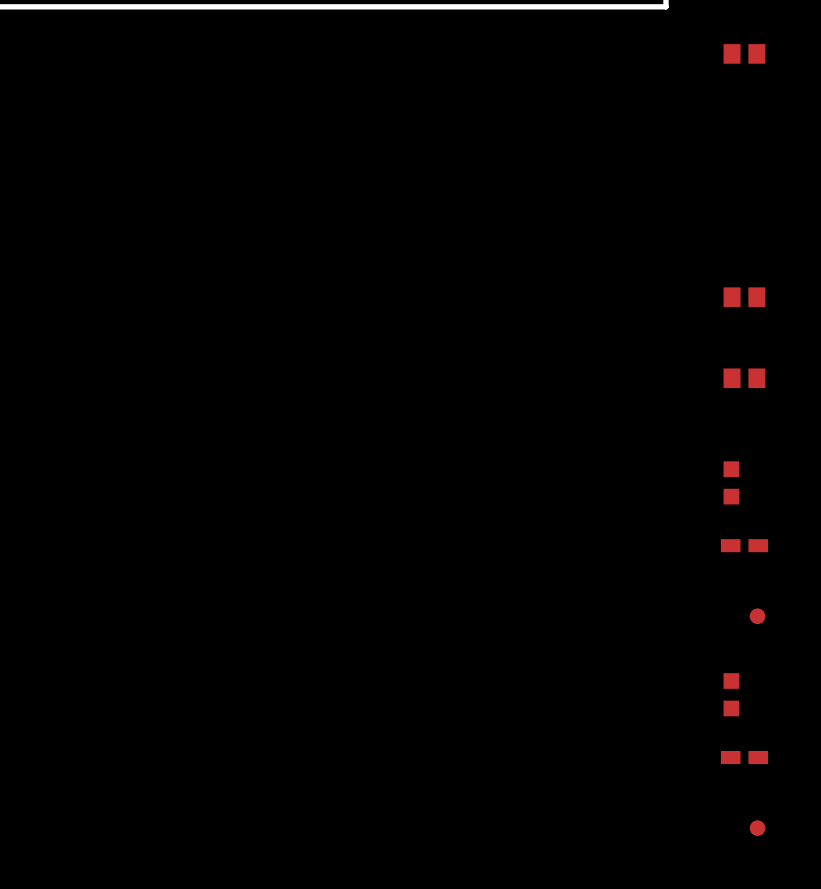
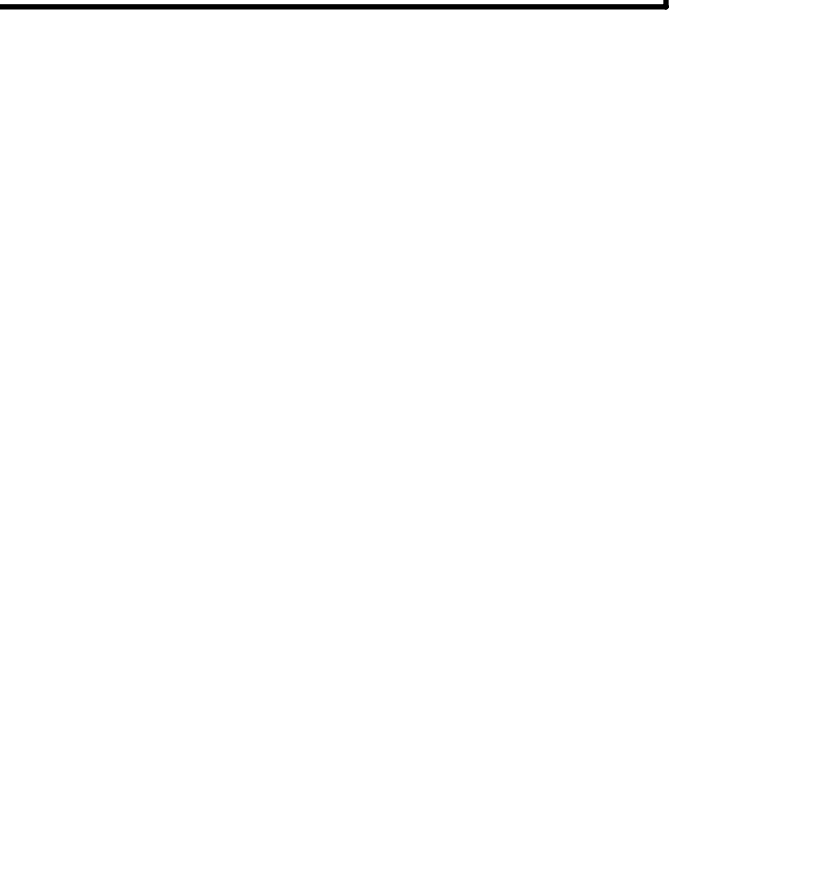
part: (744, 53) -> none
part: (744, 297) -> none
part: (744, 378) -> none
part: (731, 482) -> none
part: (744, 545) -> none
part: (757, 616) -> none
part: (731, 694) -> none
part: (744, 757) -> none
part: (757, 828) -> none

